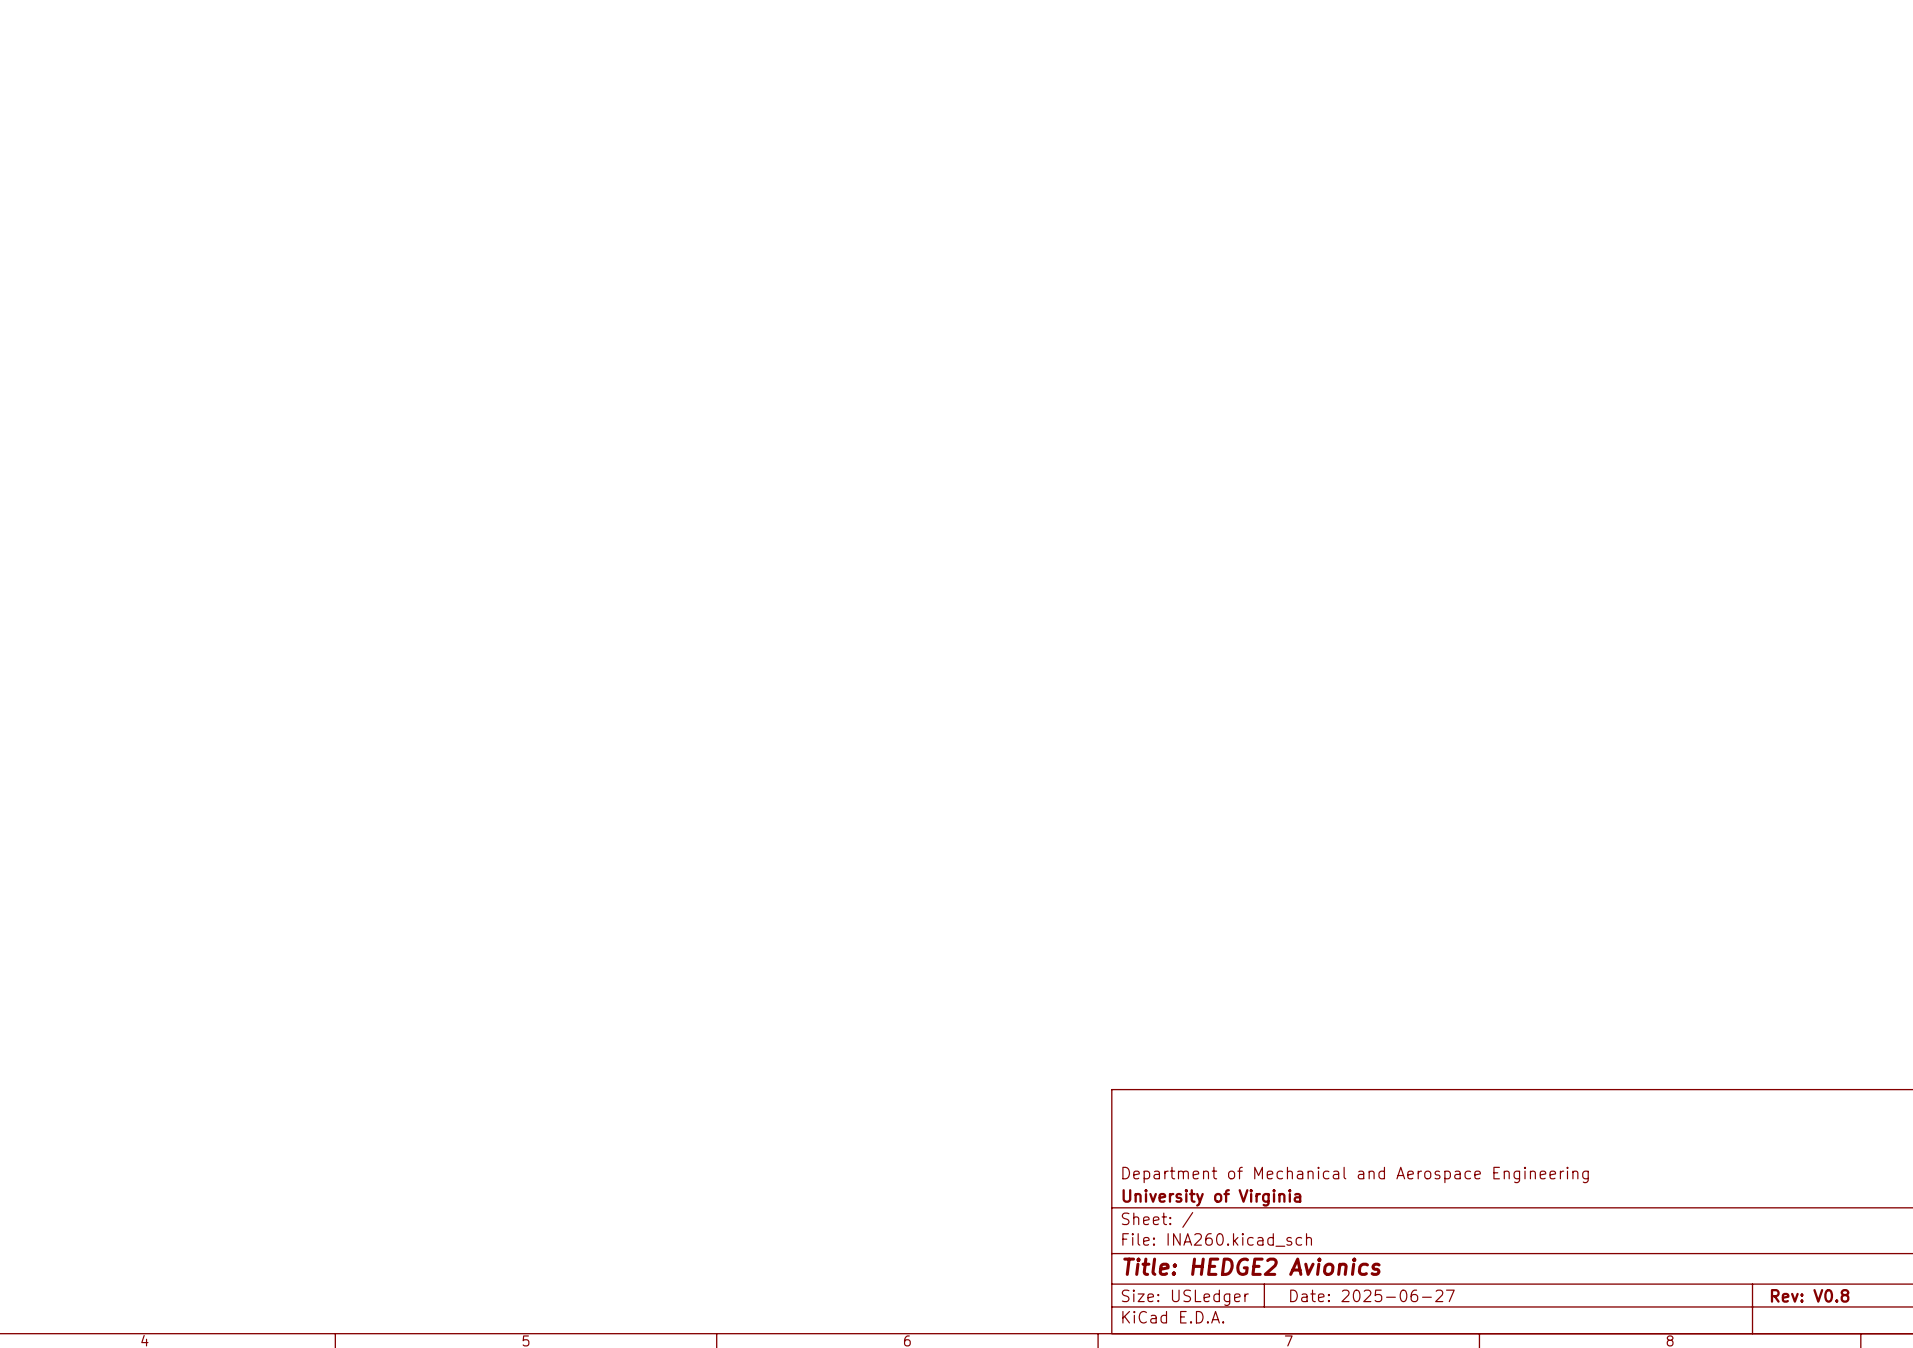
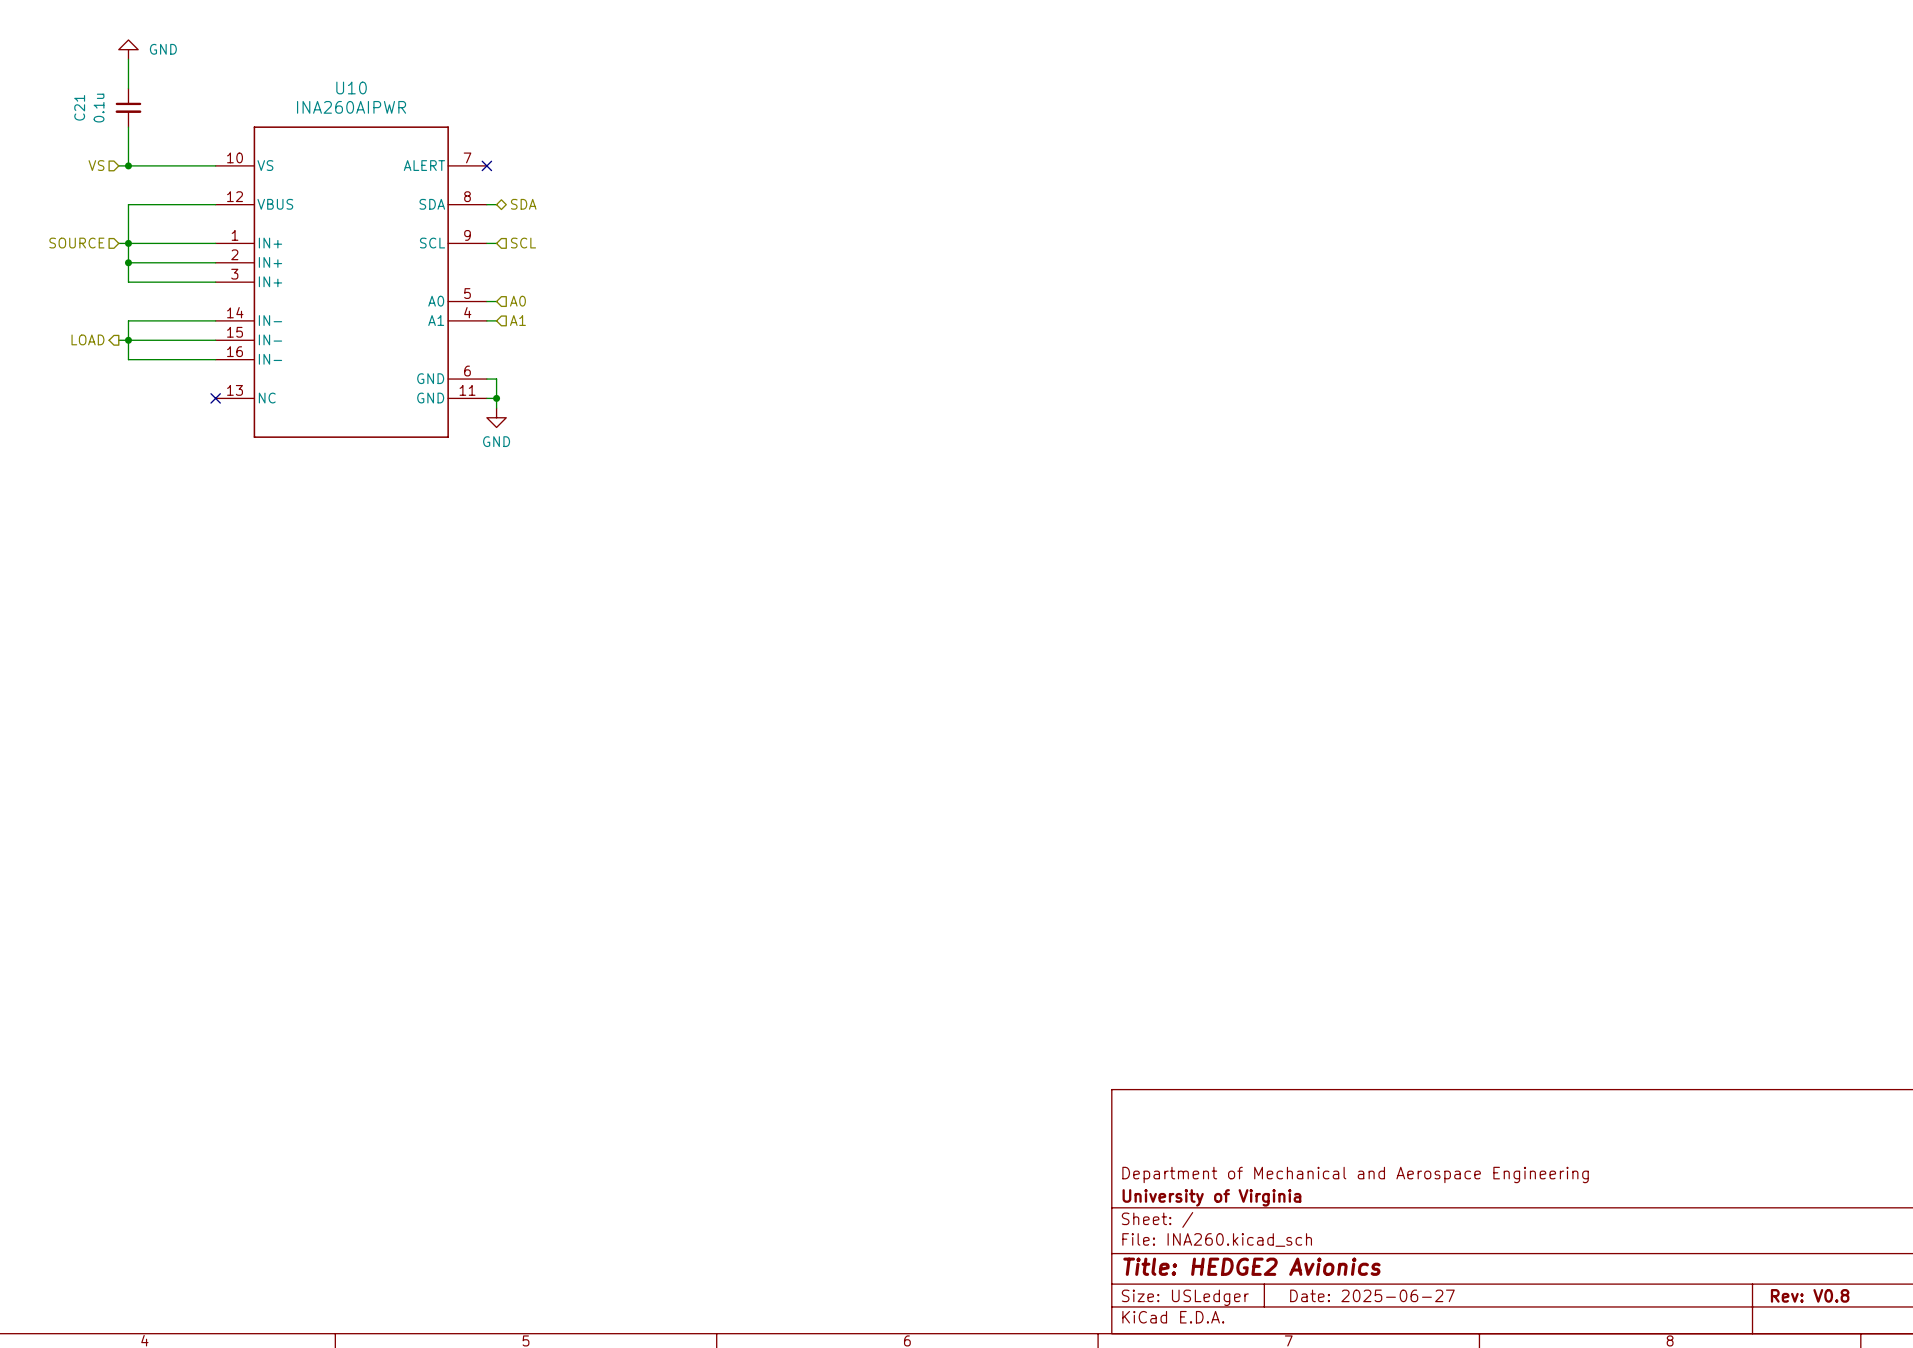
power symbol: none -> GND (128, 49)
wire: none -> (128, 59) (128, 88)
C21: none -> 0.1u (128, 107)
wire: none -> (128, 127) (128, 165)
hierarchical label: none -> VS (96, 165)
wire: none -> (118, 165) (215, 165)
junction: none -> (128, 165)
no-connect mark: none -> (486, 165)
wire: none -> (215, 204) (128, 204) (128, 282) (215, 282)
wire: none -> (486, 204) (496, 204)
hierarchical label: none -> SDA (523, 204)
hierarchical label: none -> SOURCE (76, 243)
wire: none -> (118, 243) (215, 243)
junction: none -> (128, 243)
wire: none -> (486, 243) (496, 243)
hierarchical label: none -> SCL (523, 243)
wire: none -> (128, 262) (215, 262)
junction: none -> (128, 262)
U10: none -> INA260AIPWR (351, 282)
wire: none -> (486, 301) (496, 301)
hierarchical label: none -> A0 (517, 301)
wire: none -> (215, 320) (128, 320) (128, 359) (215, 359)
wire: none -> (486, 320) (496, 320)
hierarchical label: none -> A1 (517, 320)
hierarchical label: none -> LOAD (87, 339)
wire: none -> (118, 340) (215, 340)
junction: none -> (128, 340)
wire: none -> (486, 379) (496, 379) (496, 408)
no-connect mark: none -> (215, 398)
wire: none -> (486, 398) (496, 398)
junction: none -> (496, 398)
power symbol: none -> GND (496, 417)

